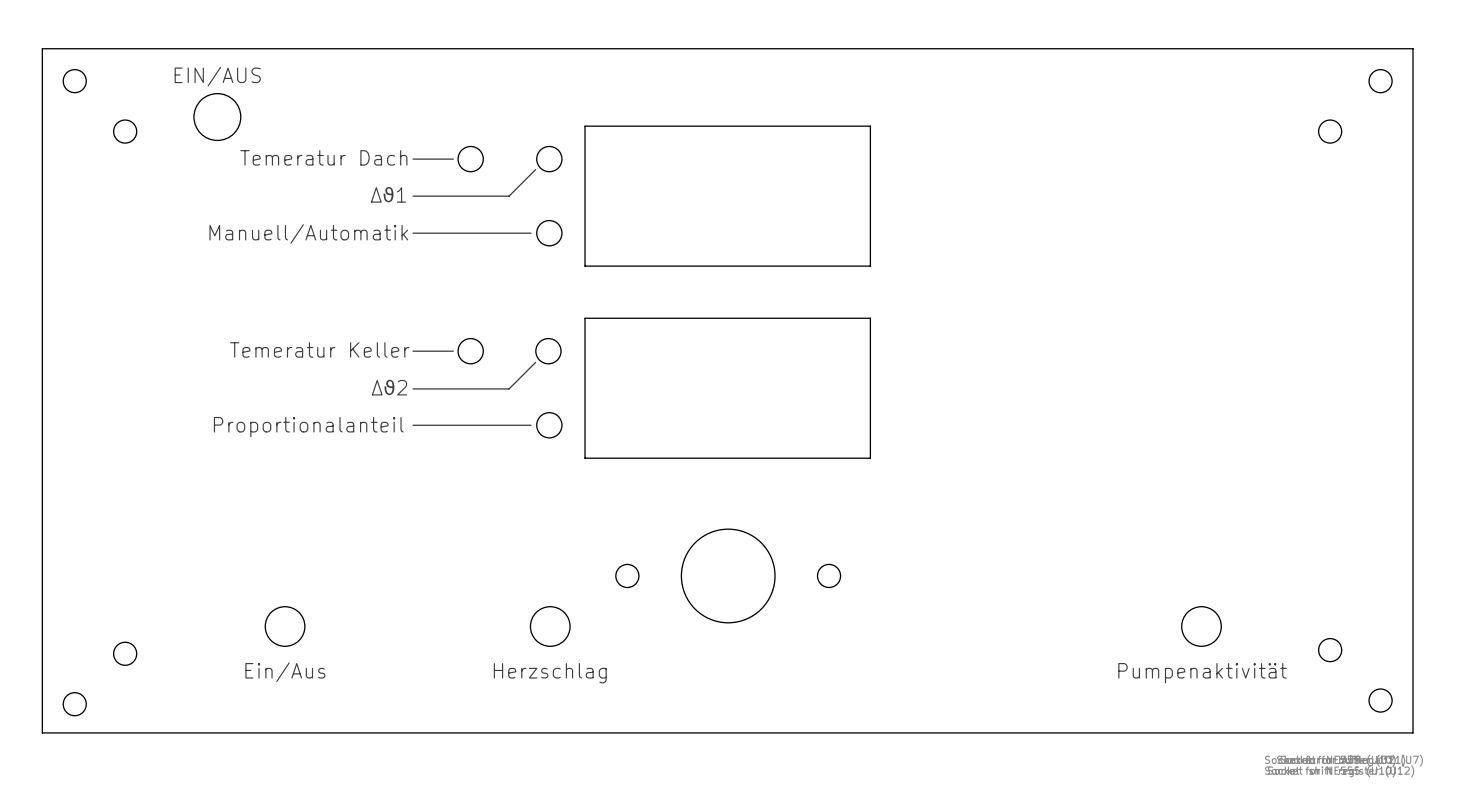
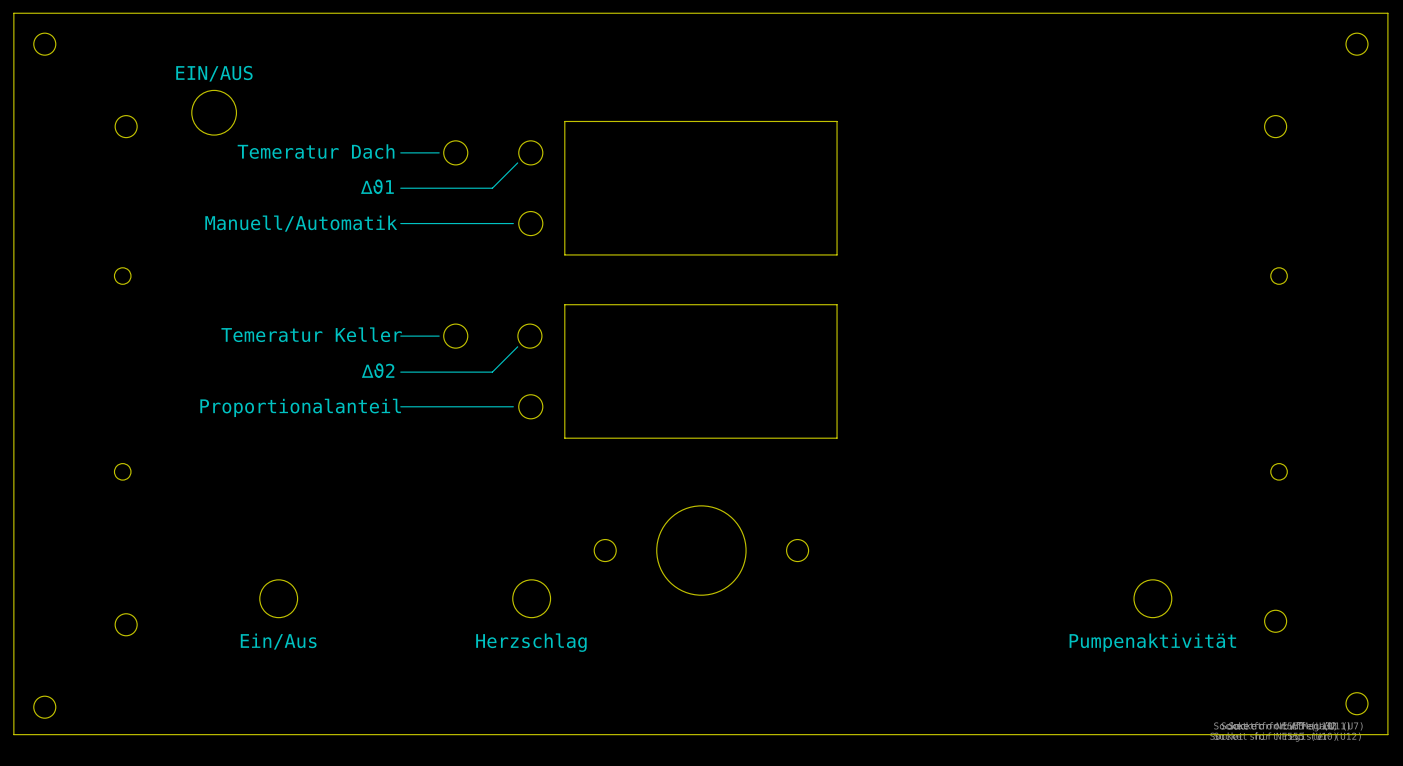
board edge: (42, 48) (1412, 48) (1412, 732) (42, 732) (42, 48) -> (13, 13) (13, 734) (1387, 734) (1387, 13) (13, 13)
round board edge position: (74, 81) -> (44, 44)
round board edge position: (1380, 81) -> (1356, 44)
round board edge: none -> [114, 267, 132, 285]
round board edge: none -> [1270, 267, 1288, 285]
round board edge: none -> [114, 463, 132, 481]
round board edge: none -> [1270, 463, 1288, 481]
round board edge position: (1380, 700) -> (1356, 703)
round board edge position: (74, 704) -> (44, 707)

